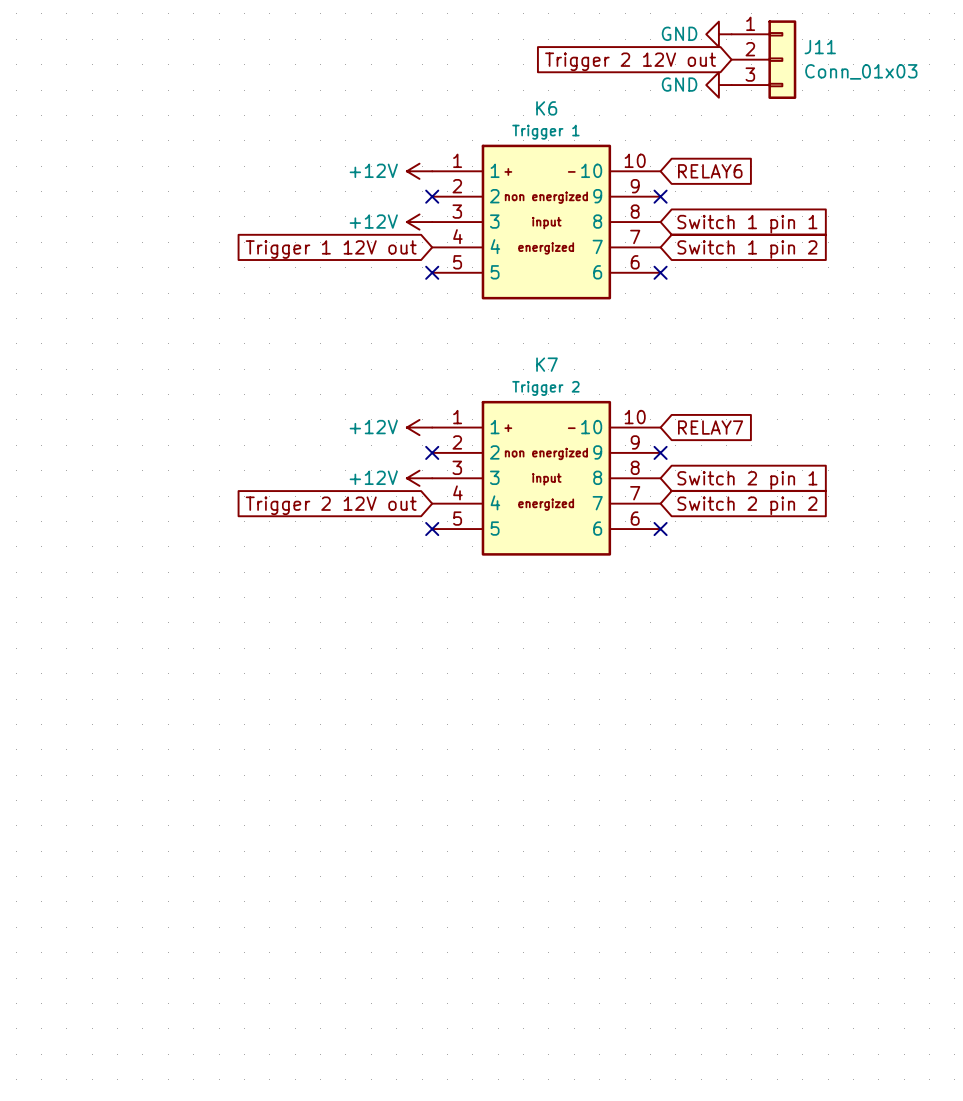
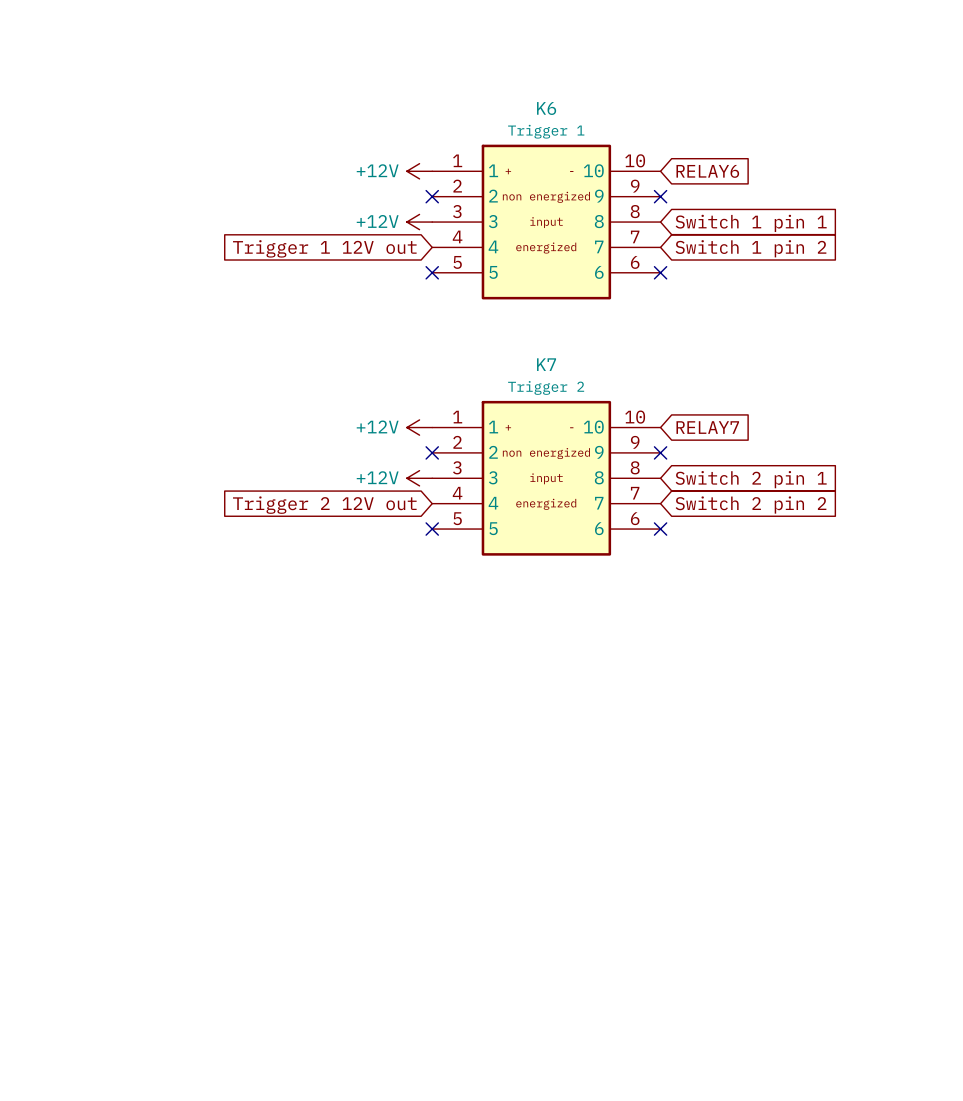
power symbol: GND (718, 34) -> none
J11: Conn_01x03 (763, 59) -> none
global label: Trigger 2 12V out (630, 61) -> none
power symbol: GND (718, 85) -> none

